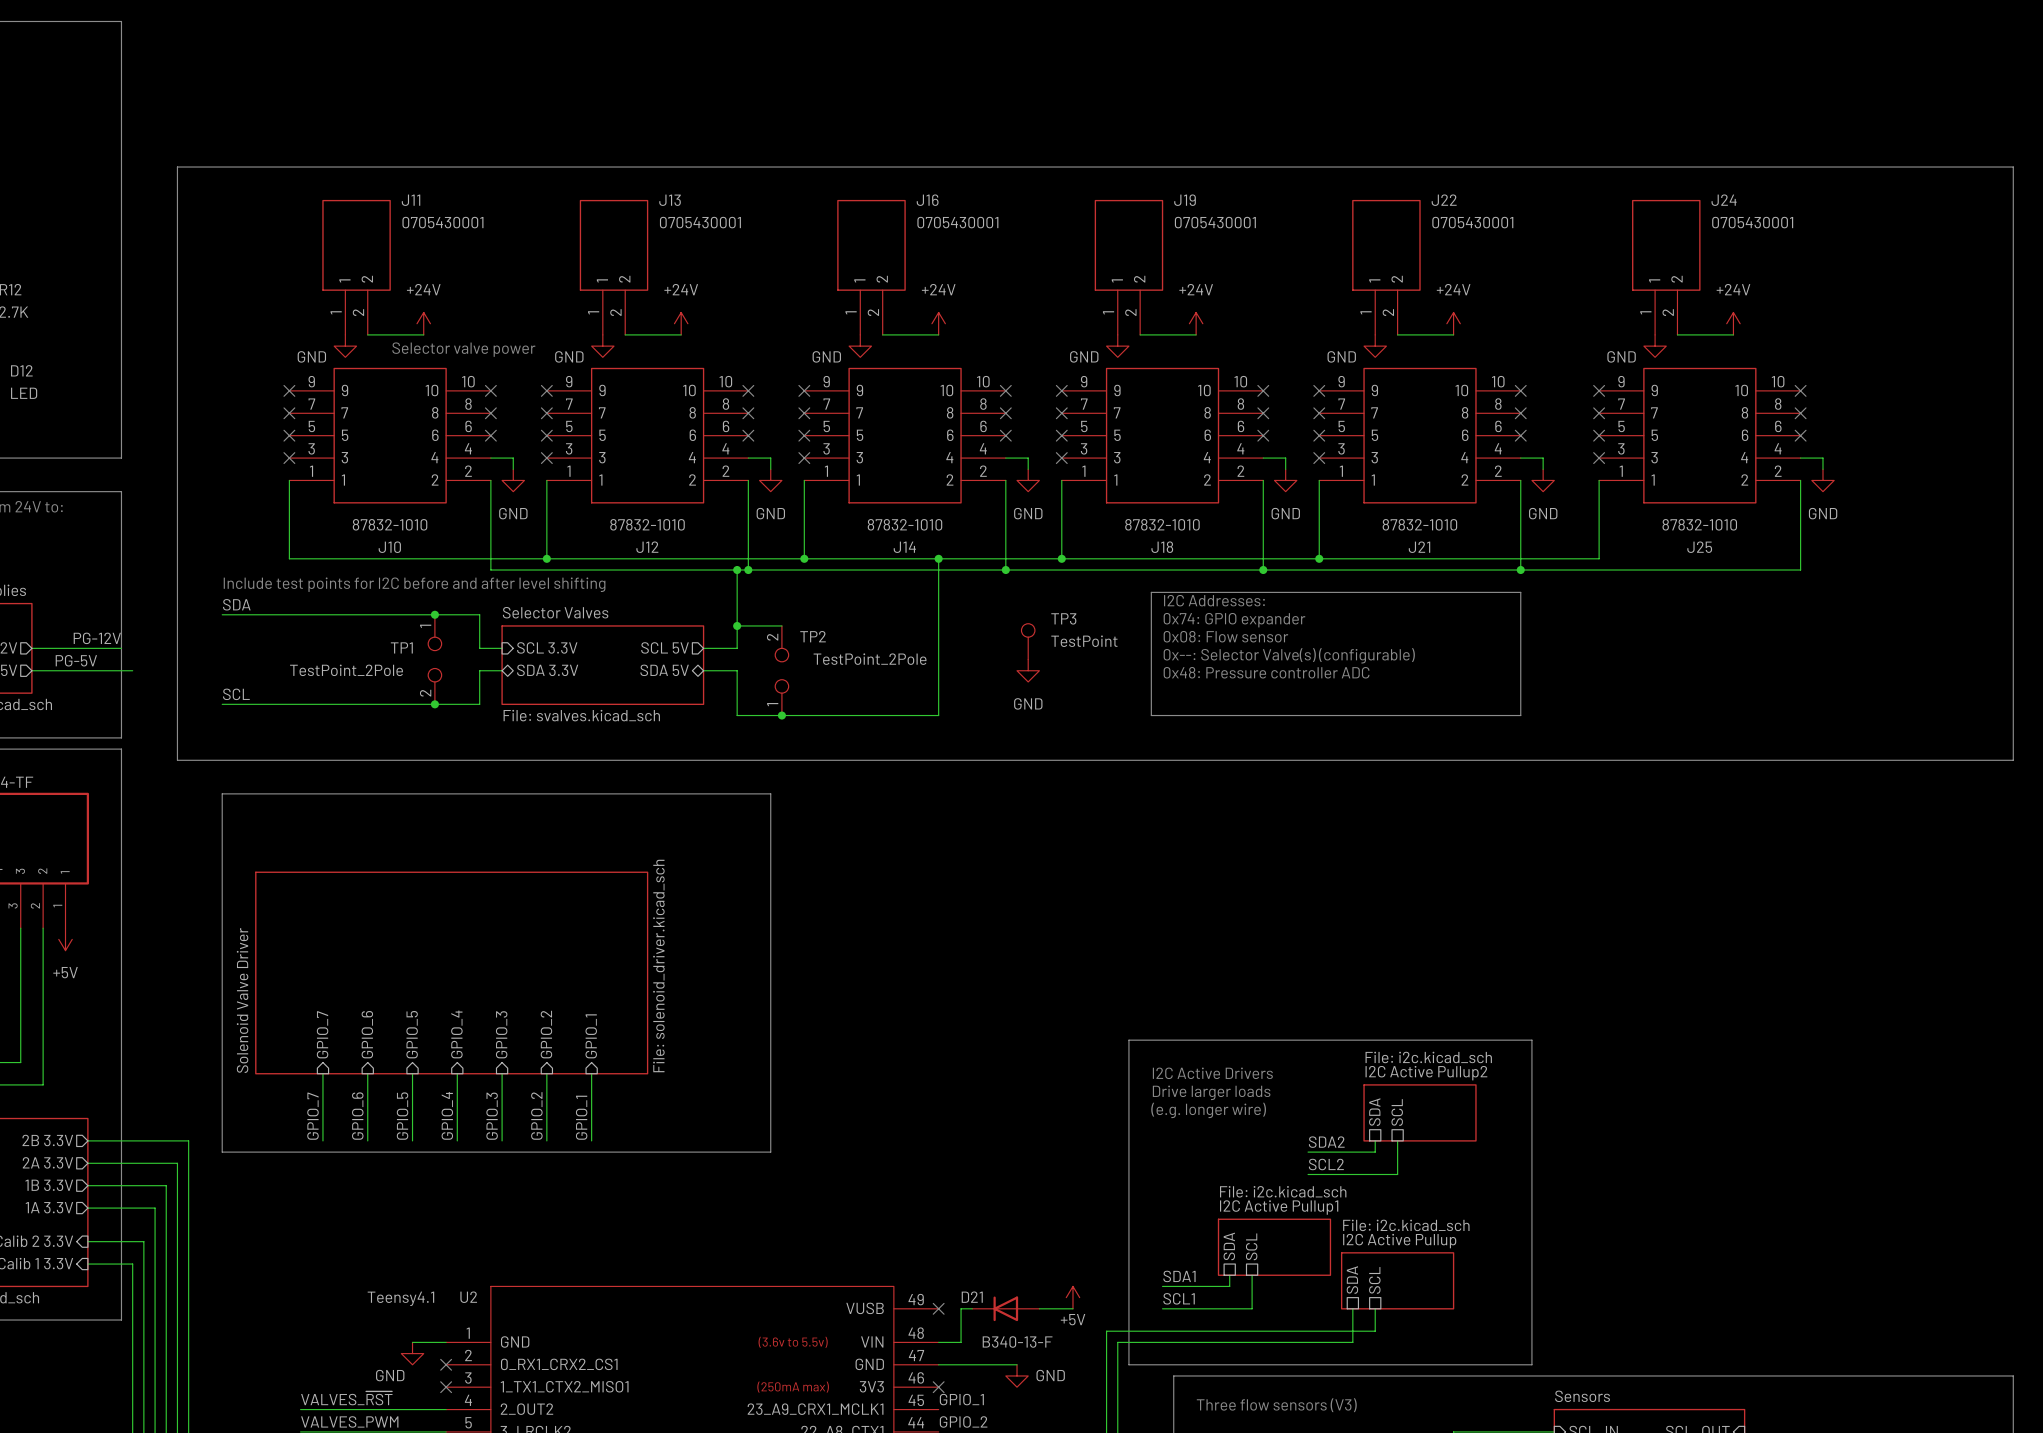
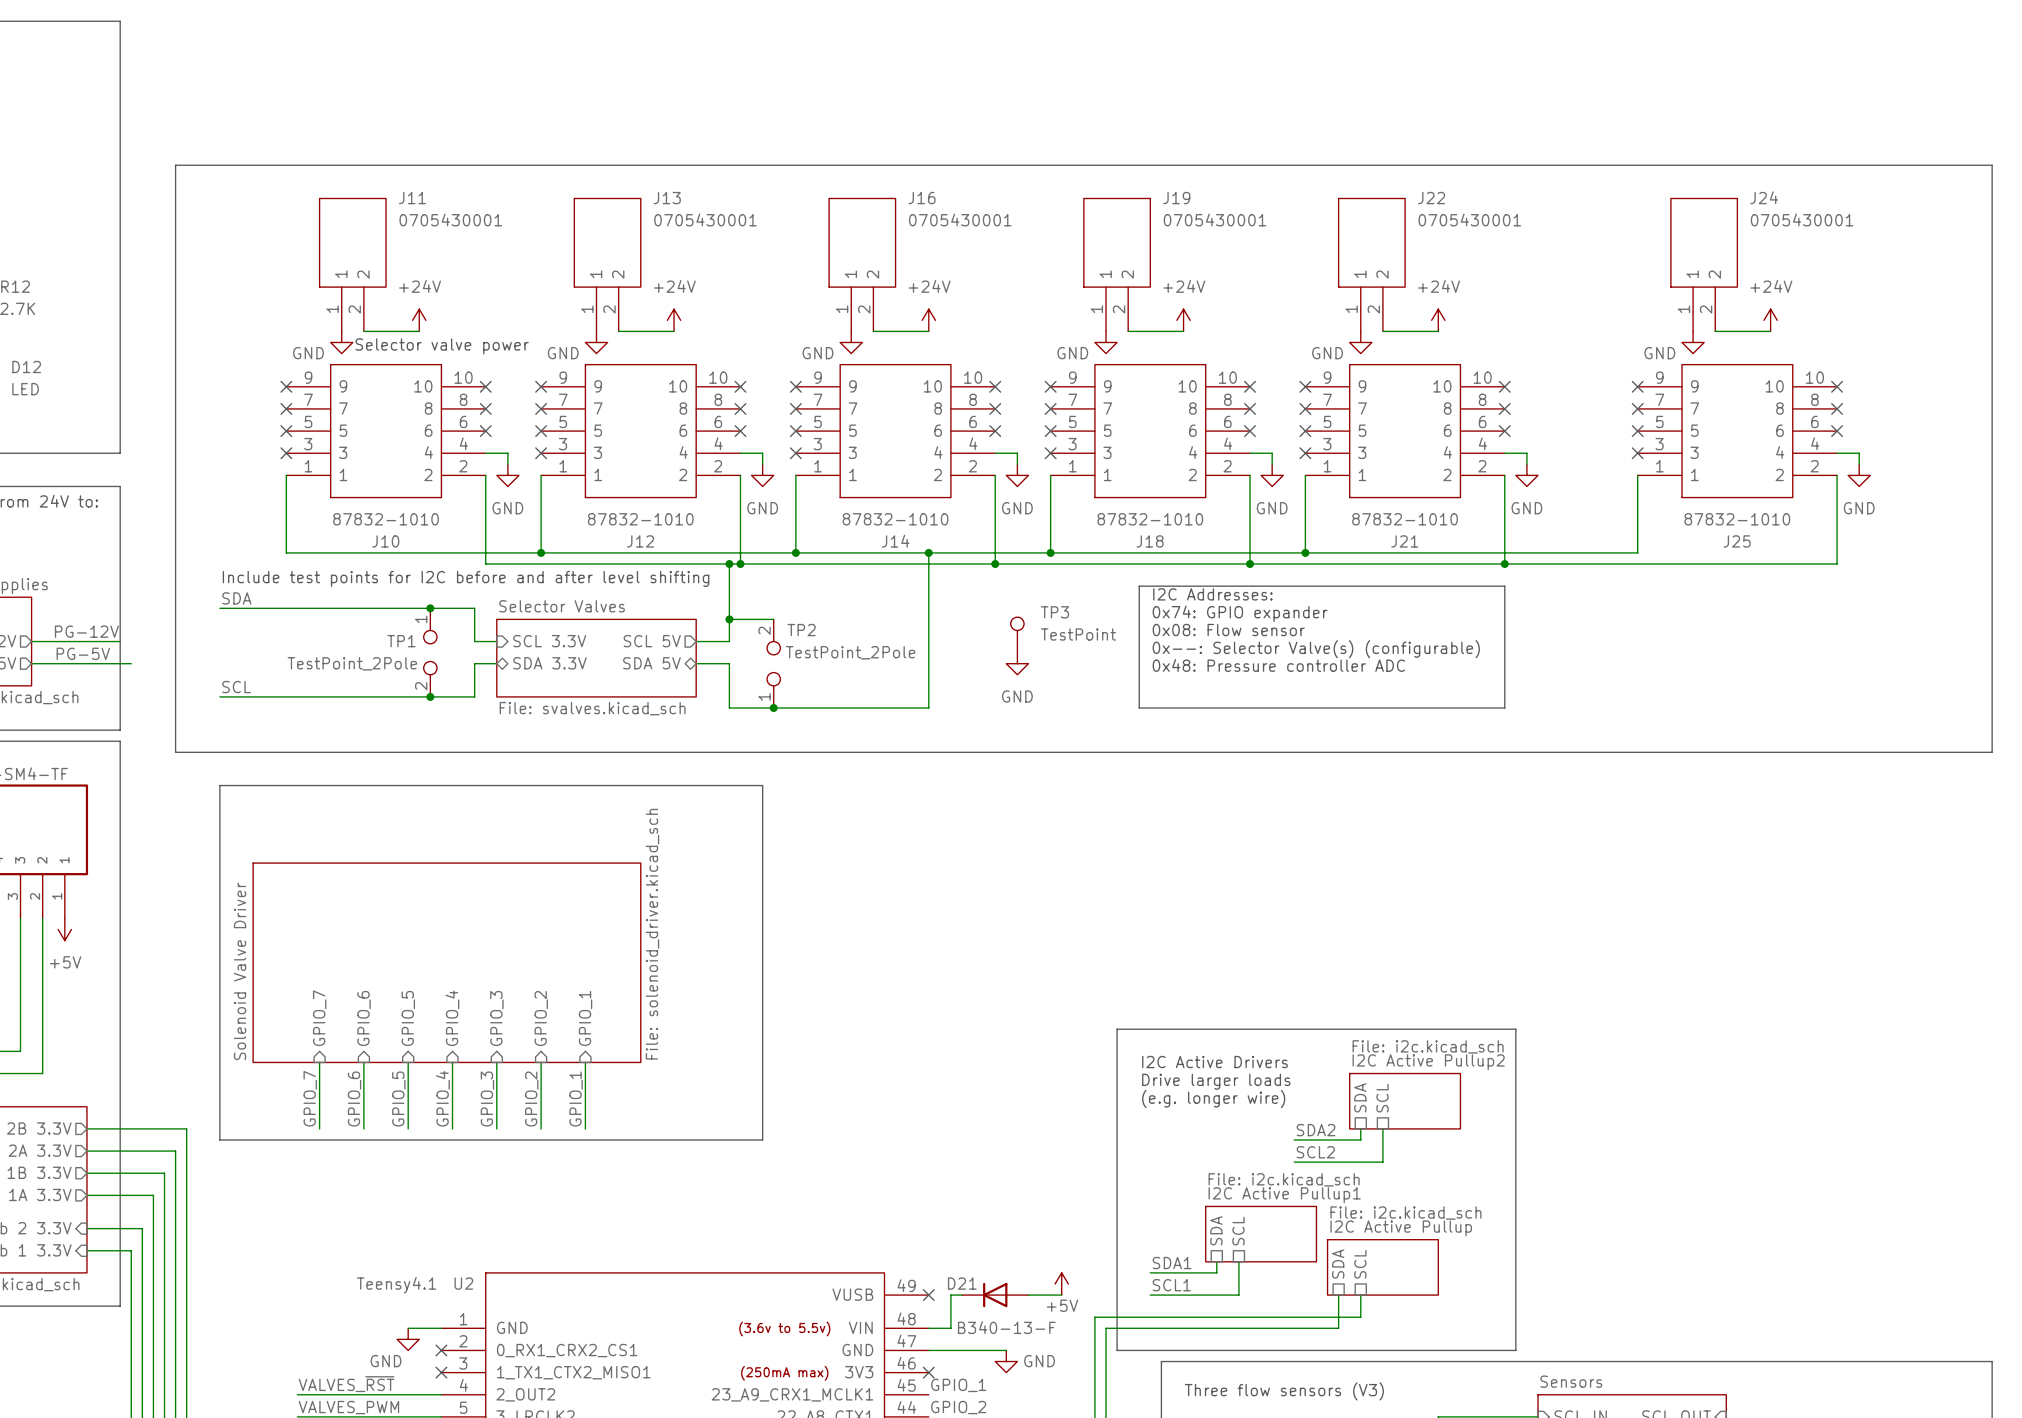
J24 position: (1666, 267) -> (1704, 264)
power symbol position: +24V (1733, 323) -> +24V (1770, 320)
wire: (1677, 334) (1733, 334) -> (1770, 331) (1715, 331)
power symbol position: GND (1655, 346) -> GND (1693, 342)
no-connect mark: (1599, 390) -> none
no-connect mark: none -> (1637, 386)
no-connect mark: (1800, 390) -> none
no-connect mark: none -> (1837, 386)
no-connect mark: (1599, 413) -> none
no-connect mark: none -> (1637, 408)
no-connect mark: (1800, 413) -> none
no-connect mark: none -> (1837, 408)
no-connect mark: (1599, 435) -> none
no-connect mark: none -> (1637, 431)
J25 position: (1699, 435) -> (1737, 431)
no-connect mark: (1800, 435) -> none
no-connect mark: none -> (1837, 431)
no-connect mark: (1599, 458) -> none
no-connect mark: none -> (1637, 453)
wire: (1800, 458) (1822, 458) (1822, 469) -> (1837, 453) (1859, 453) (1859, 464)
wire: (1599, 480) (1599, 558) -> (1637, 475) (1637, 552) (1582, 552)
wire: (1800, 480) (1800, 570) -> (1837, 475) (1837, 564) (1781, 564)
power symbol position: GND (1822, 480) -> GND (1859, 475)

